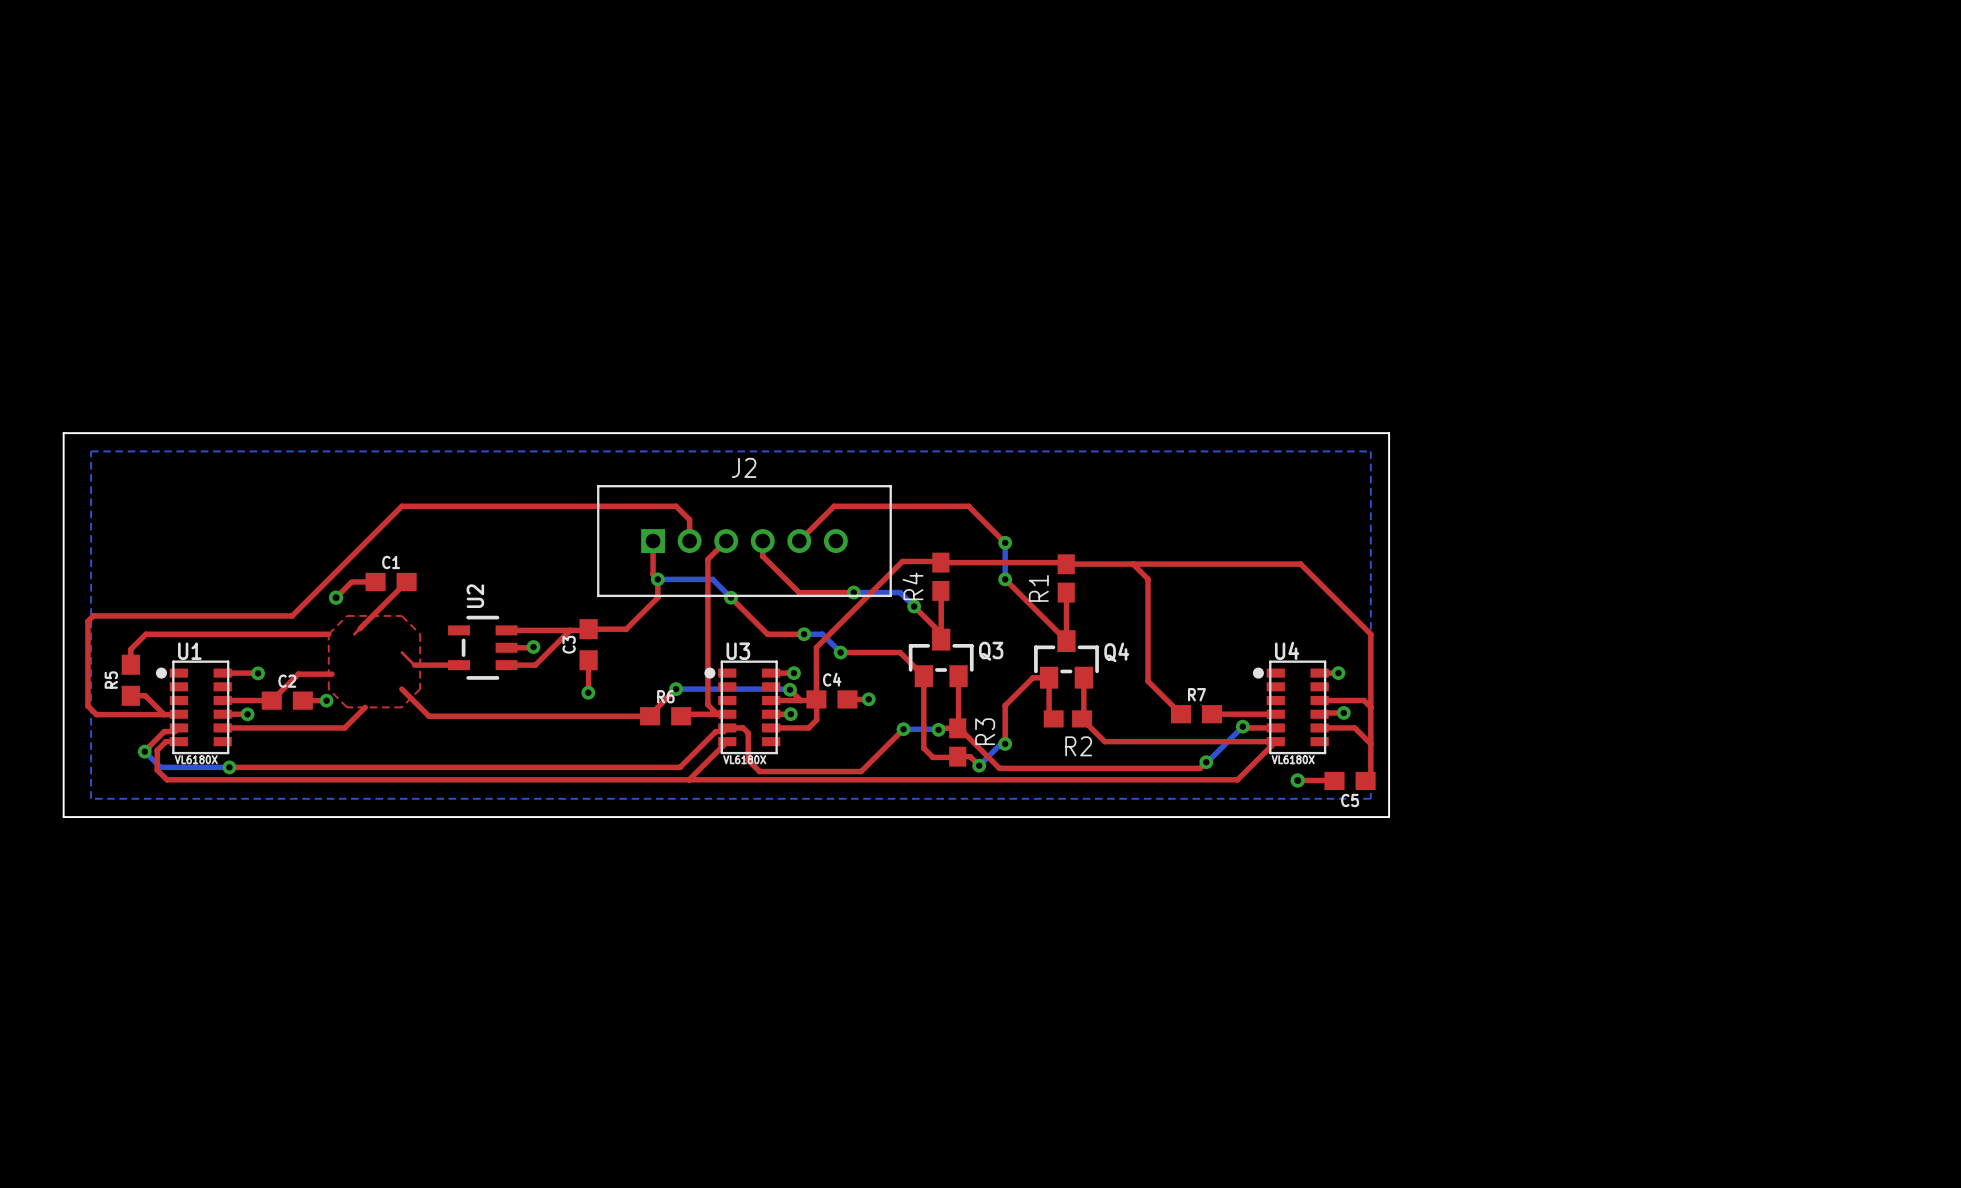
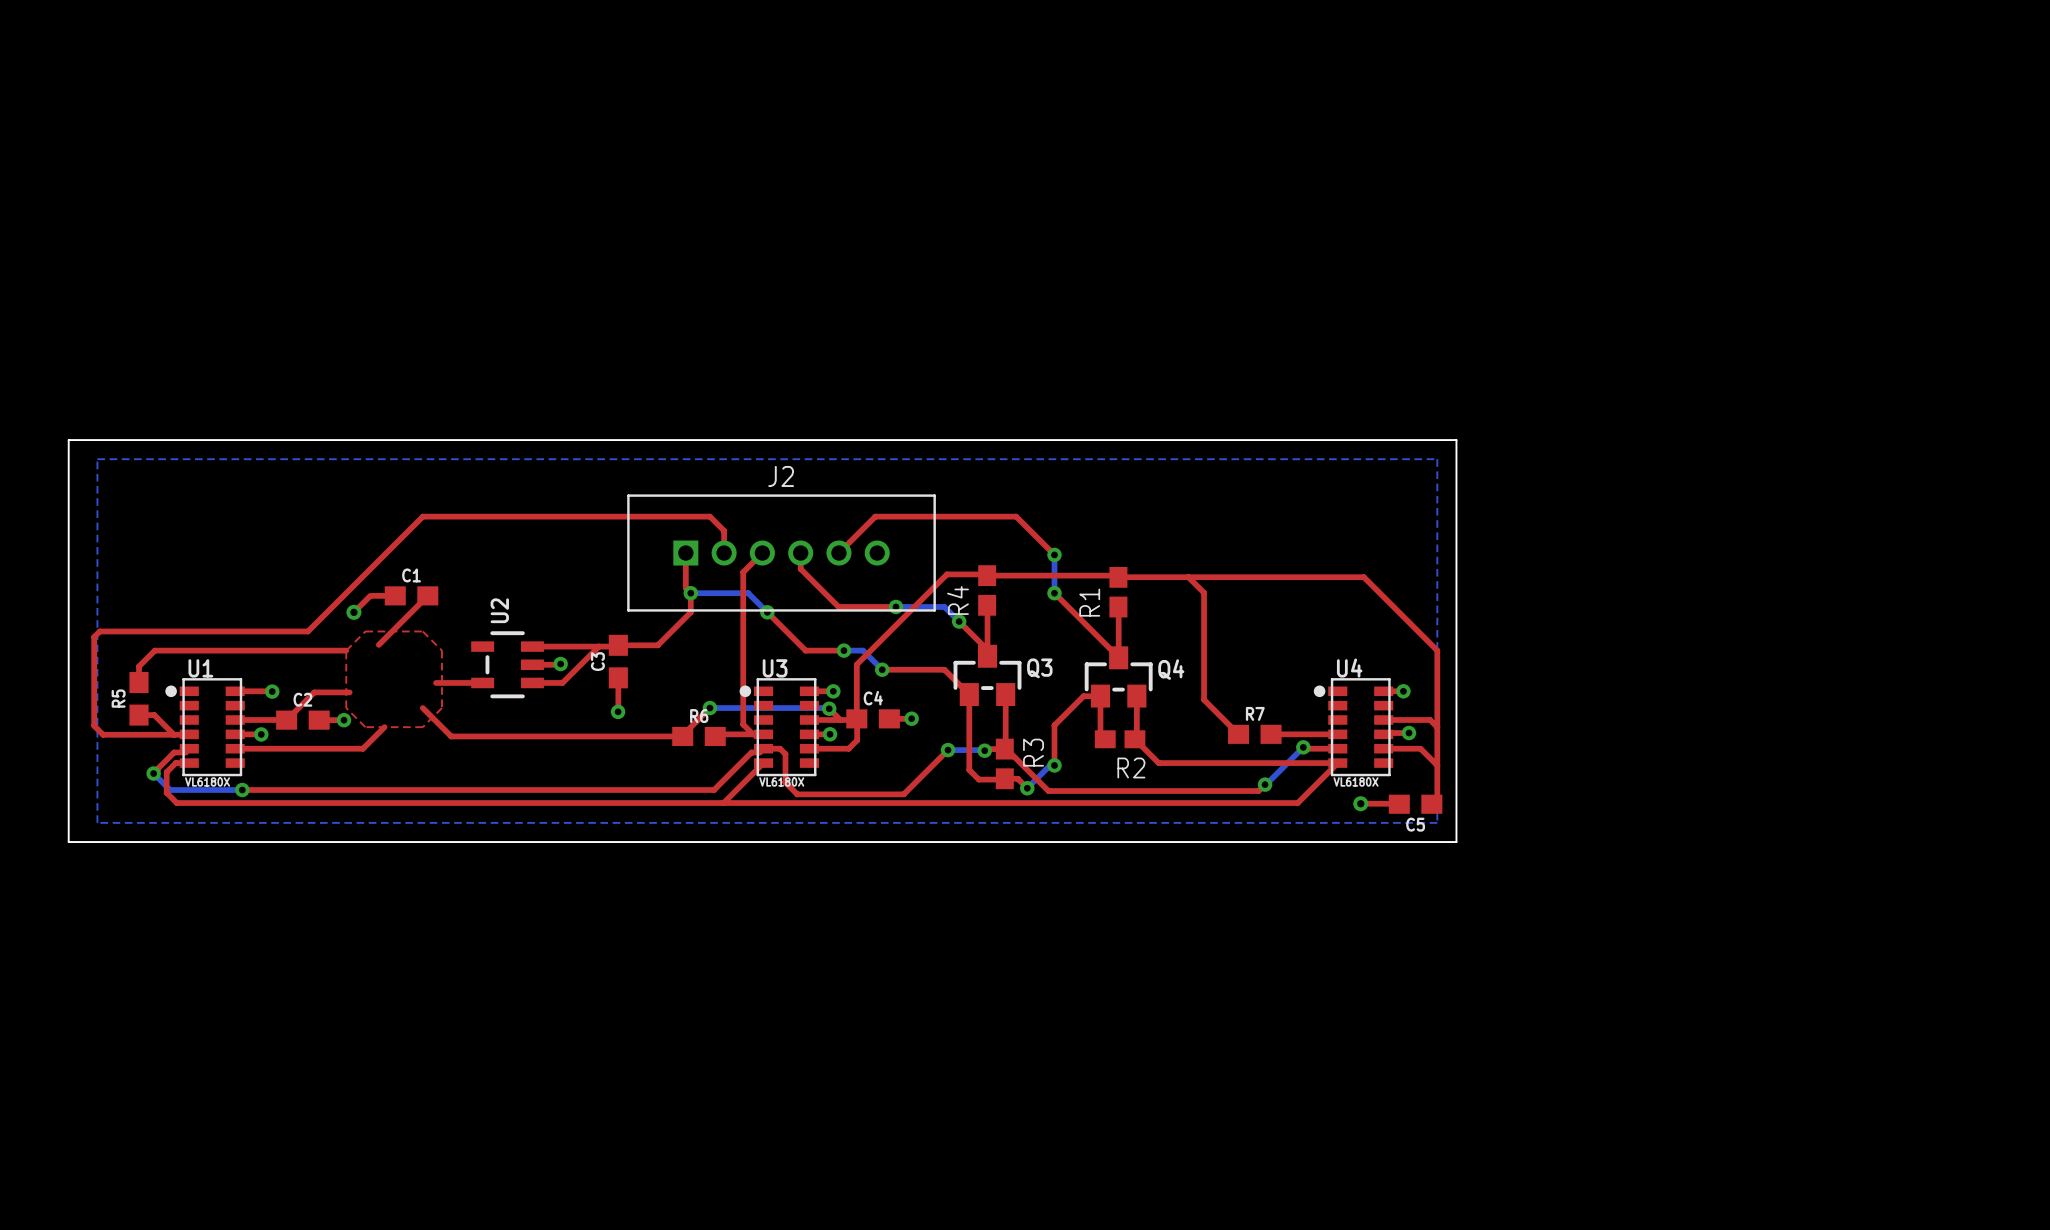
top track: (359, 628) (354, 634) -> none
top track: (401, 652) (414, 665) -> none

